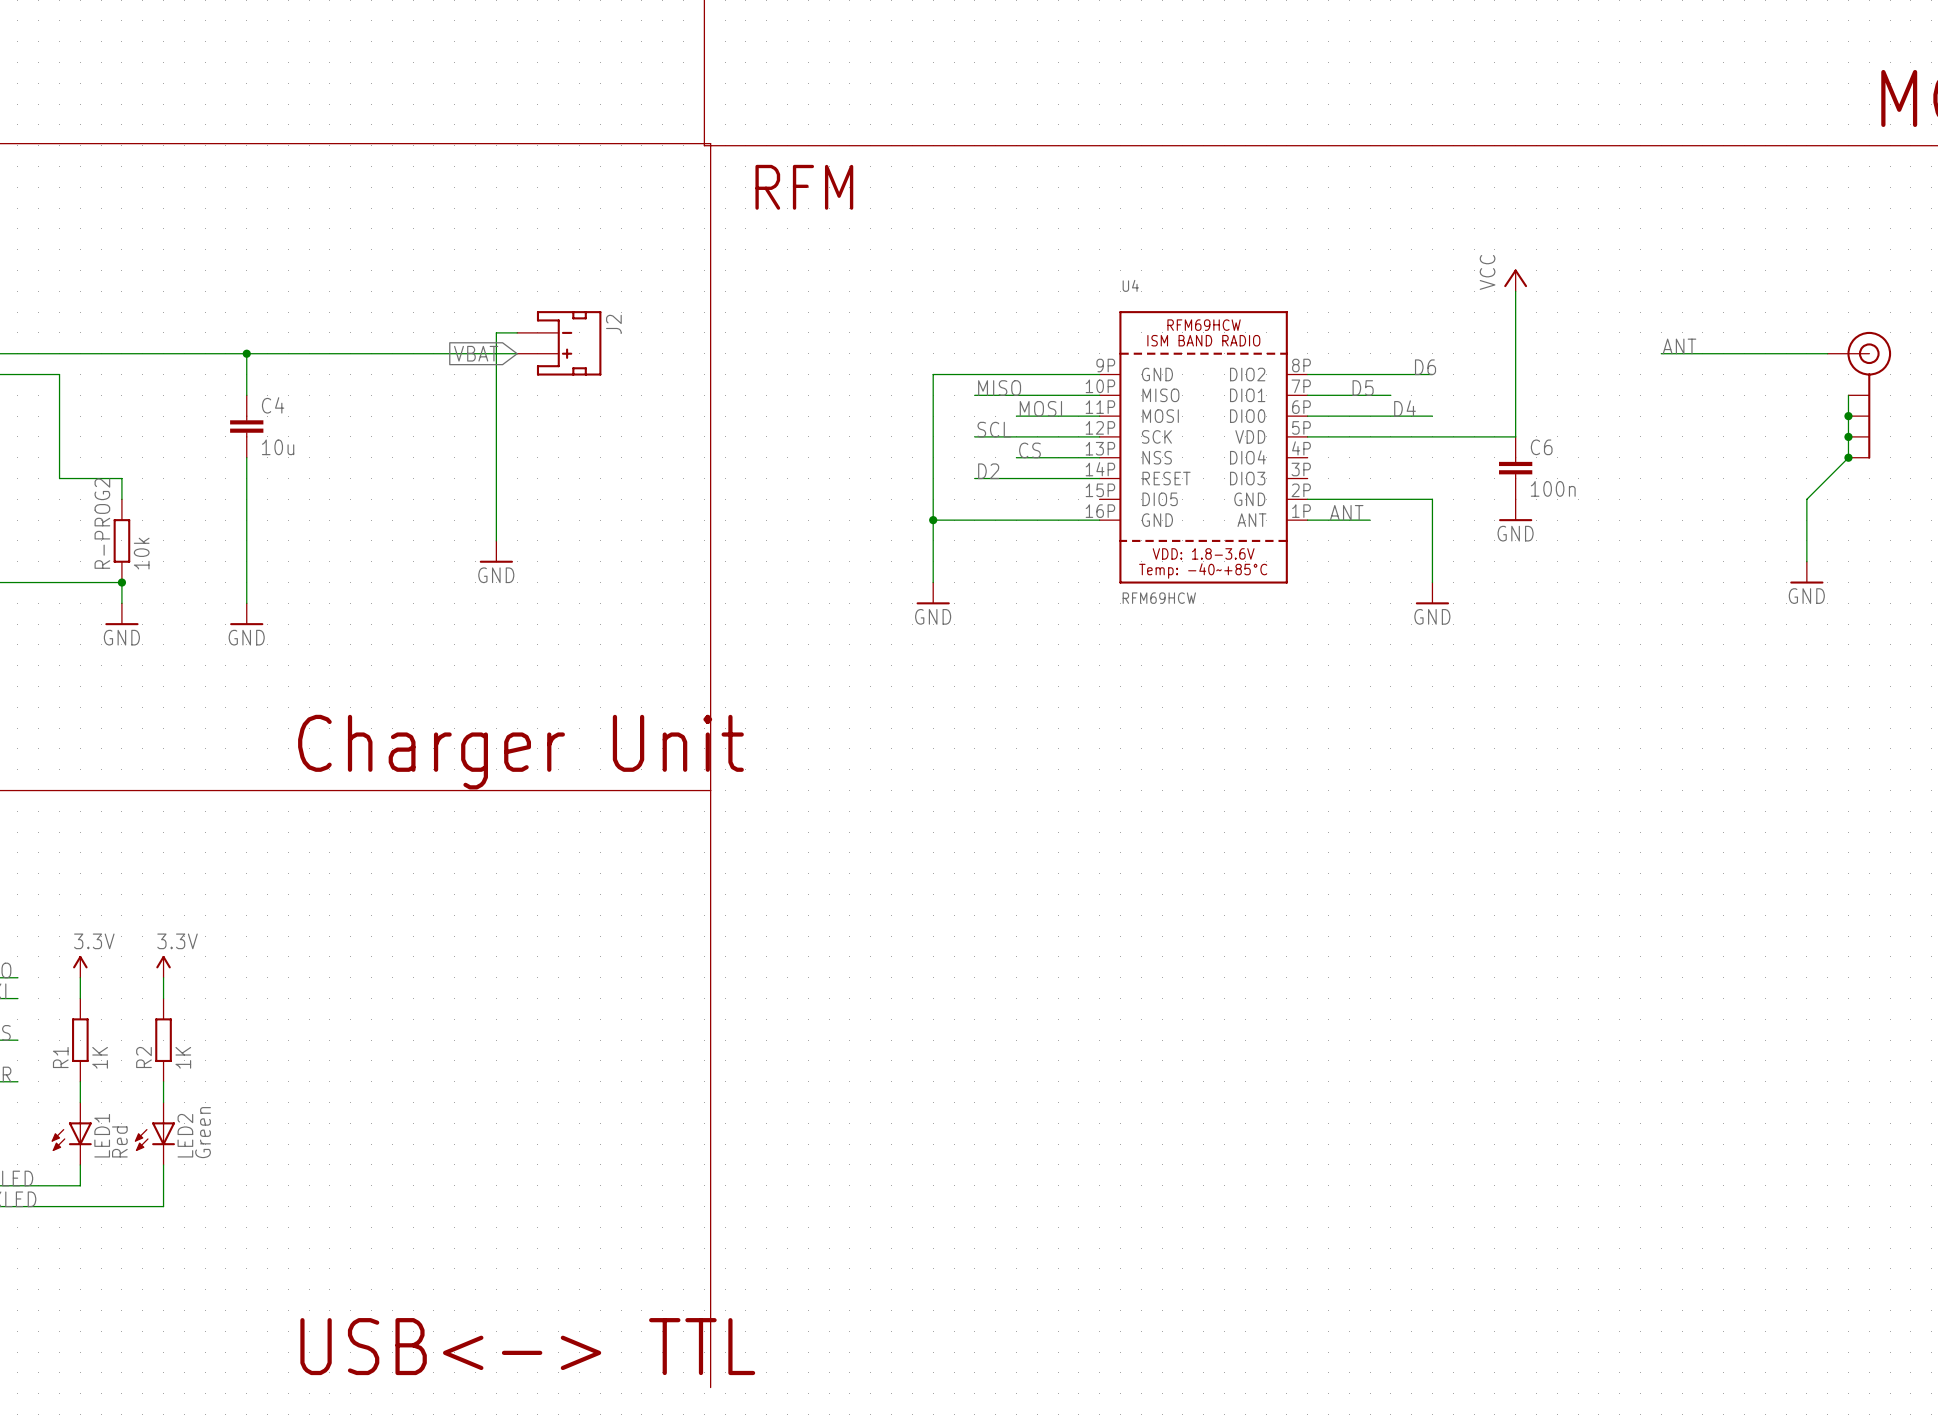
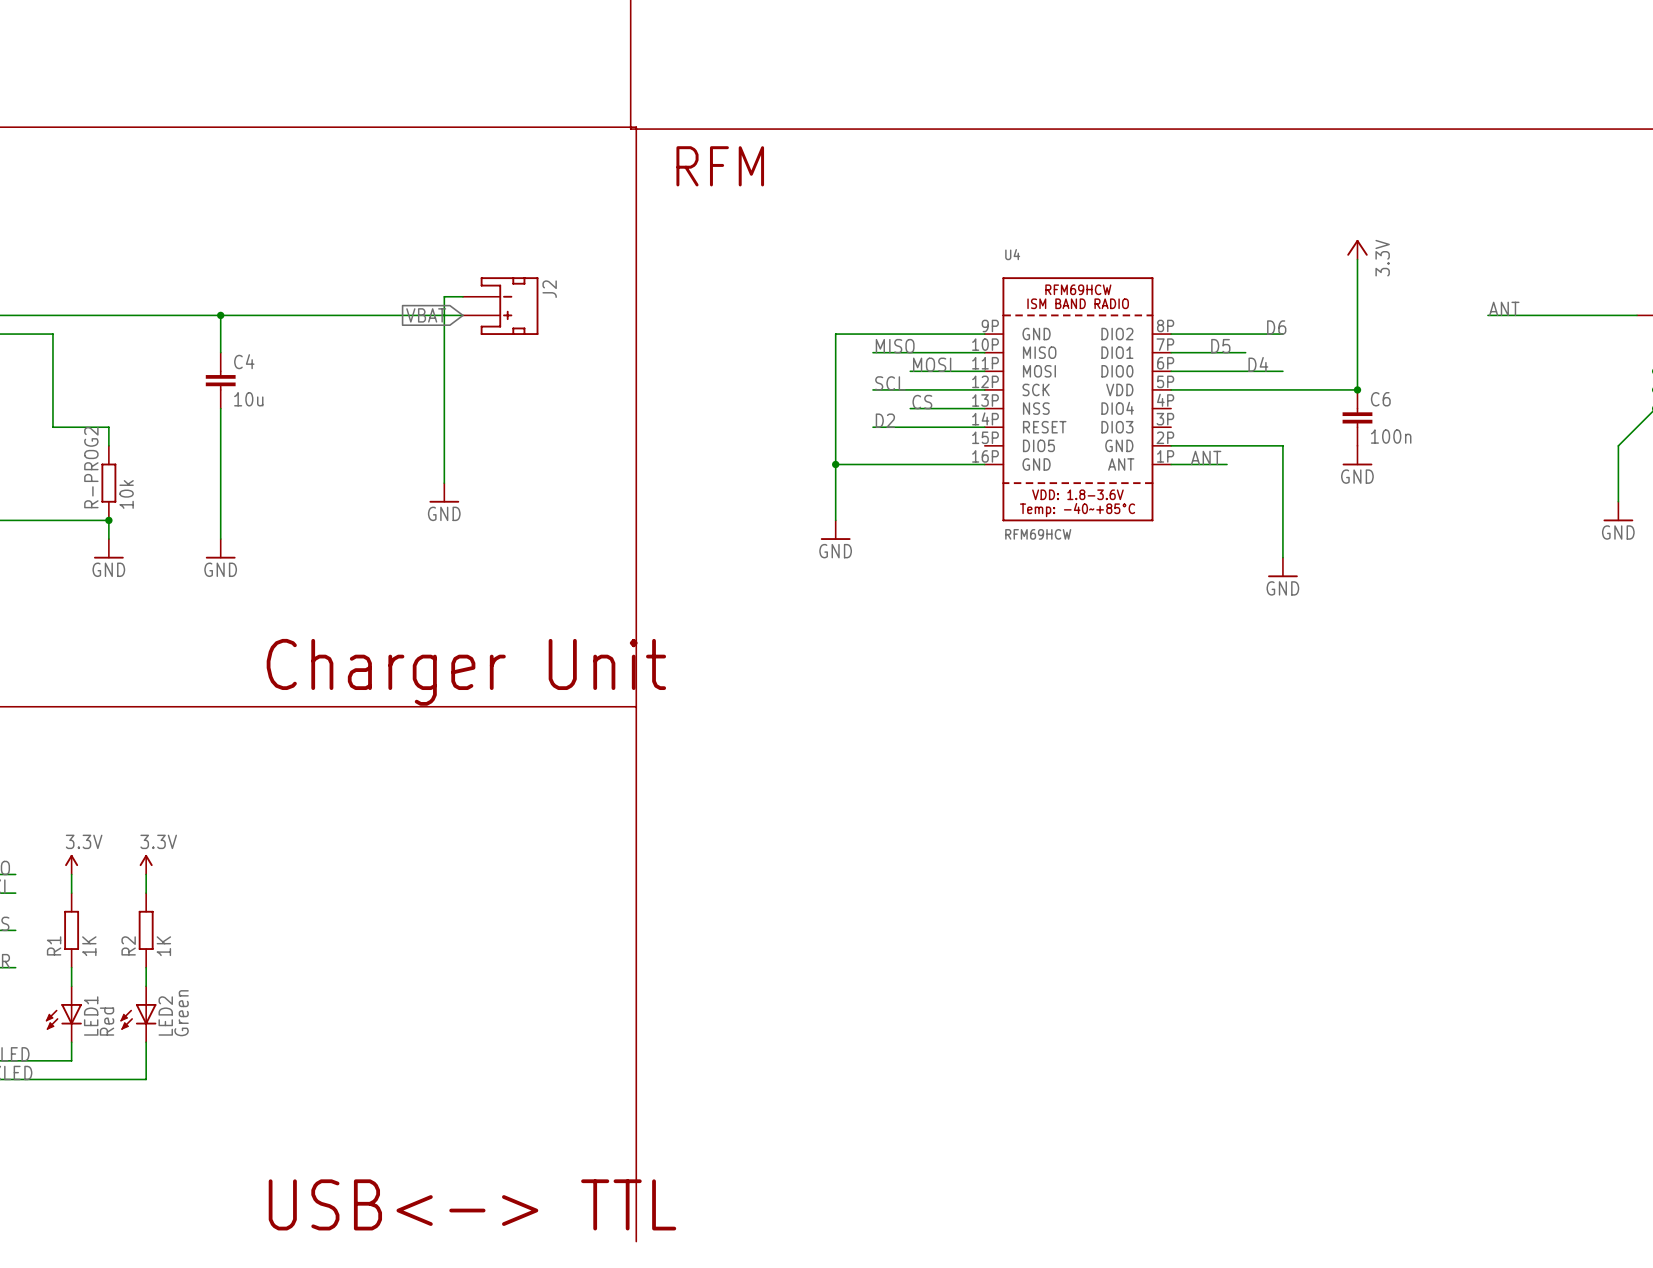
power symbol: VCC (1515, 280) -> 3.3V (1357, 249)
junction: none -> (1357, 389)
power symbol position: GND (1432, 593) -> GND (1282, 567)

